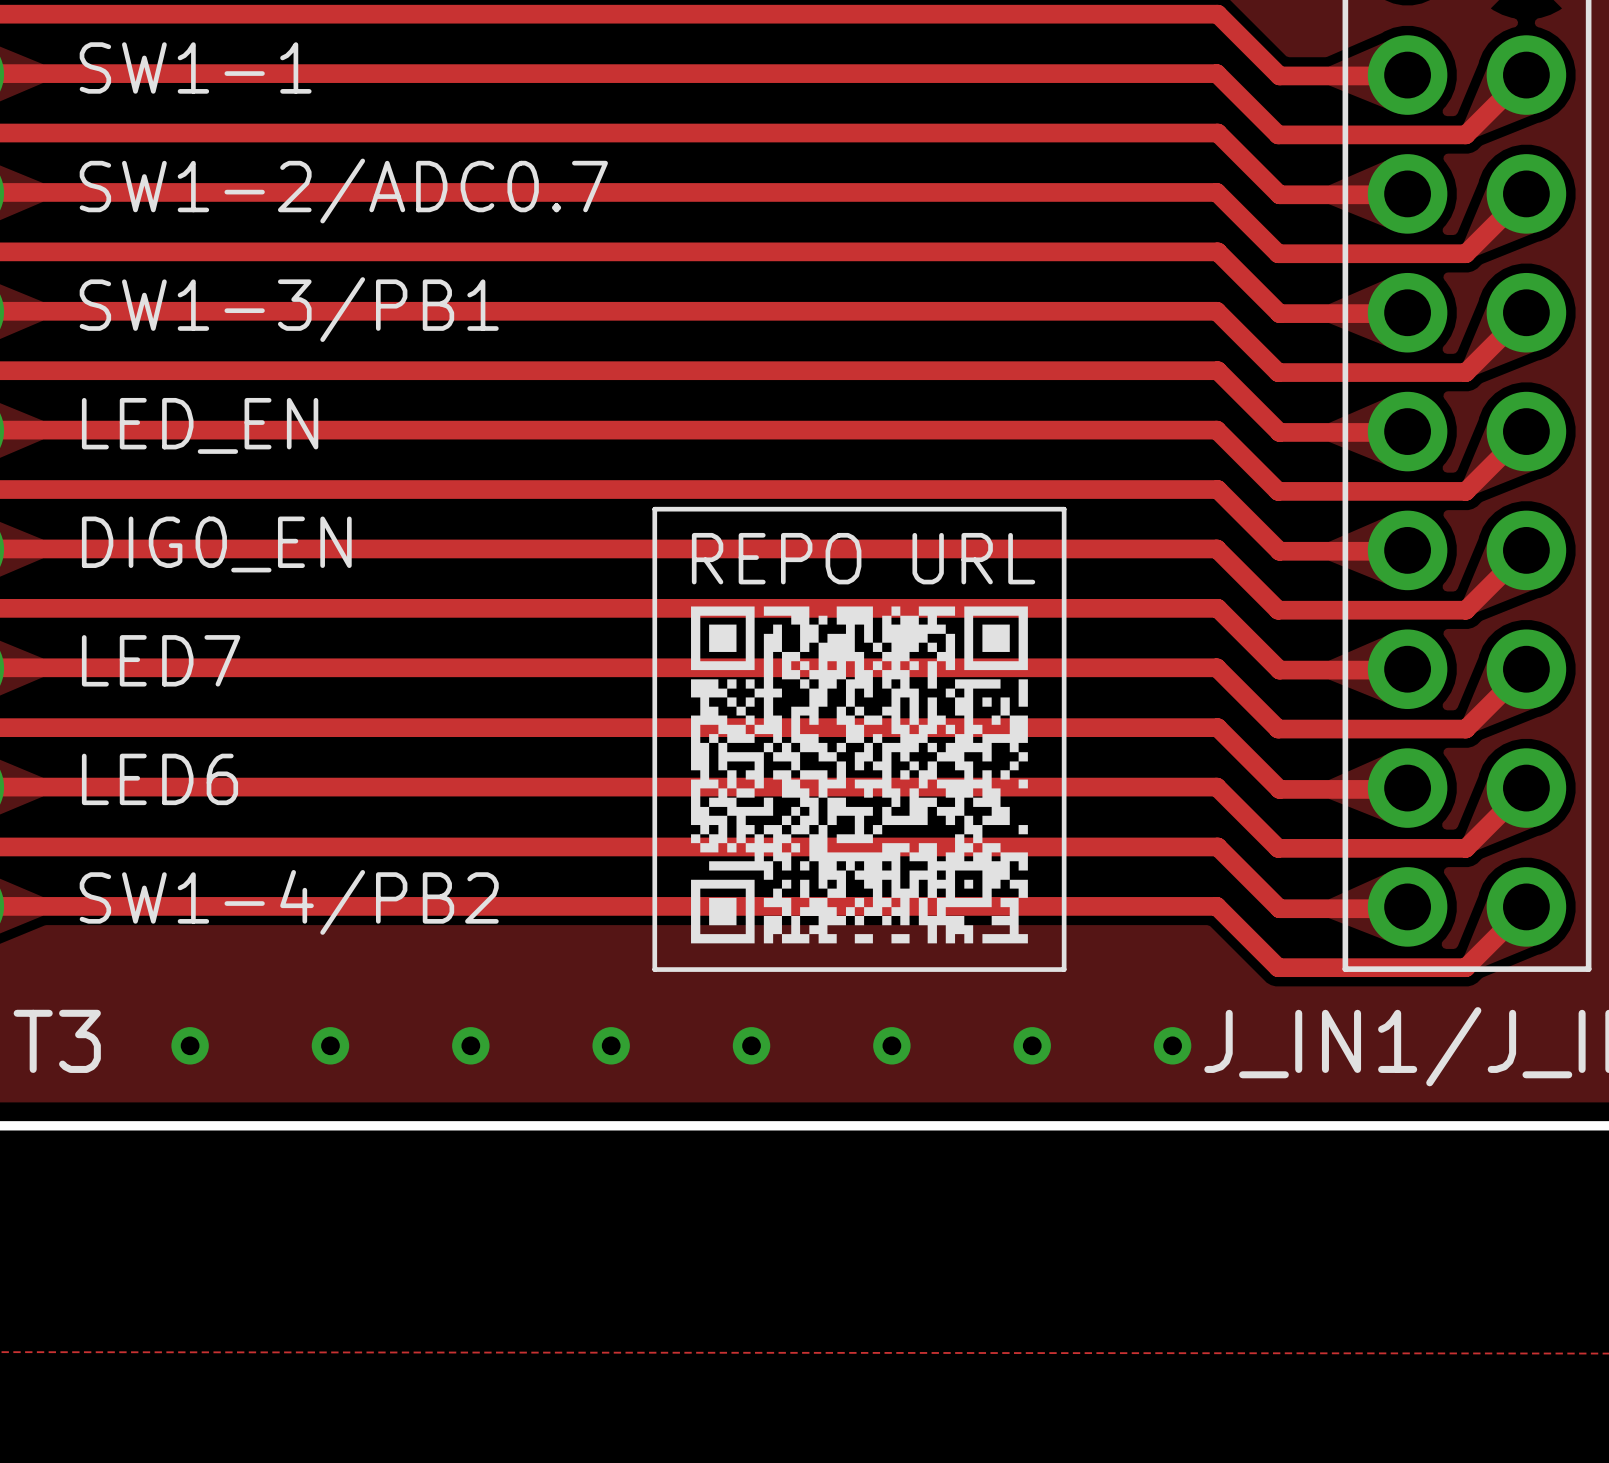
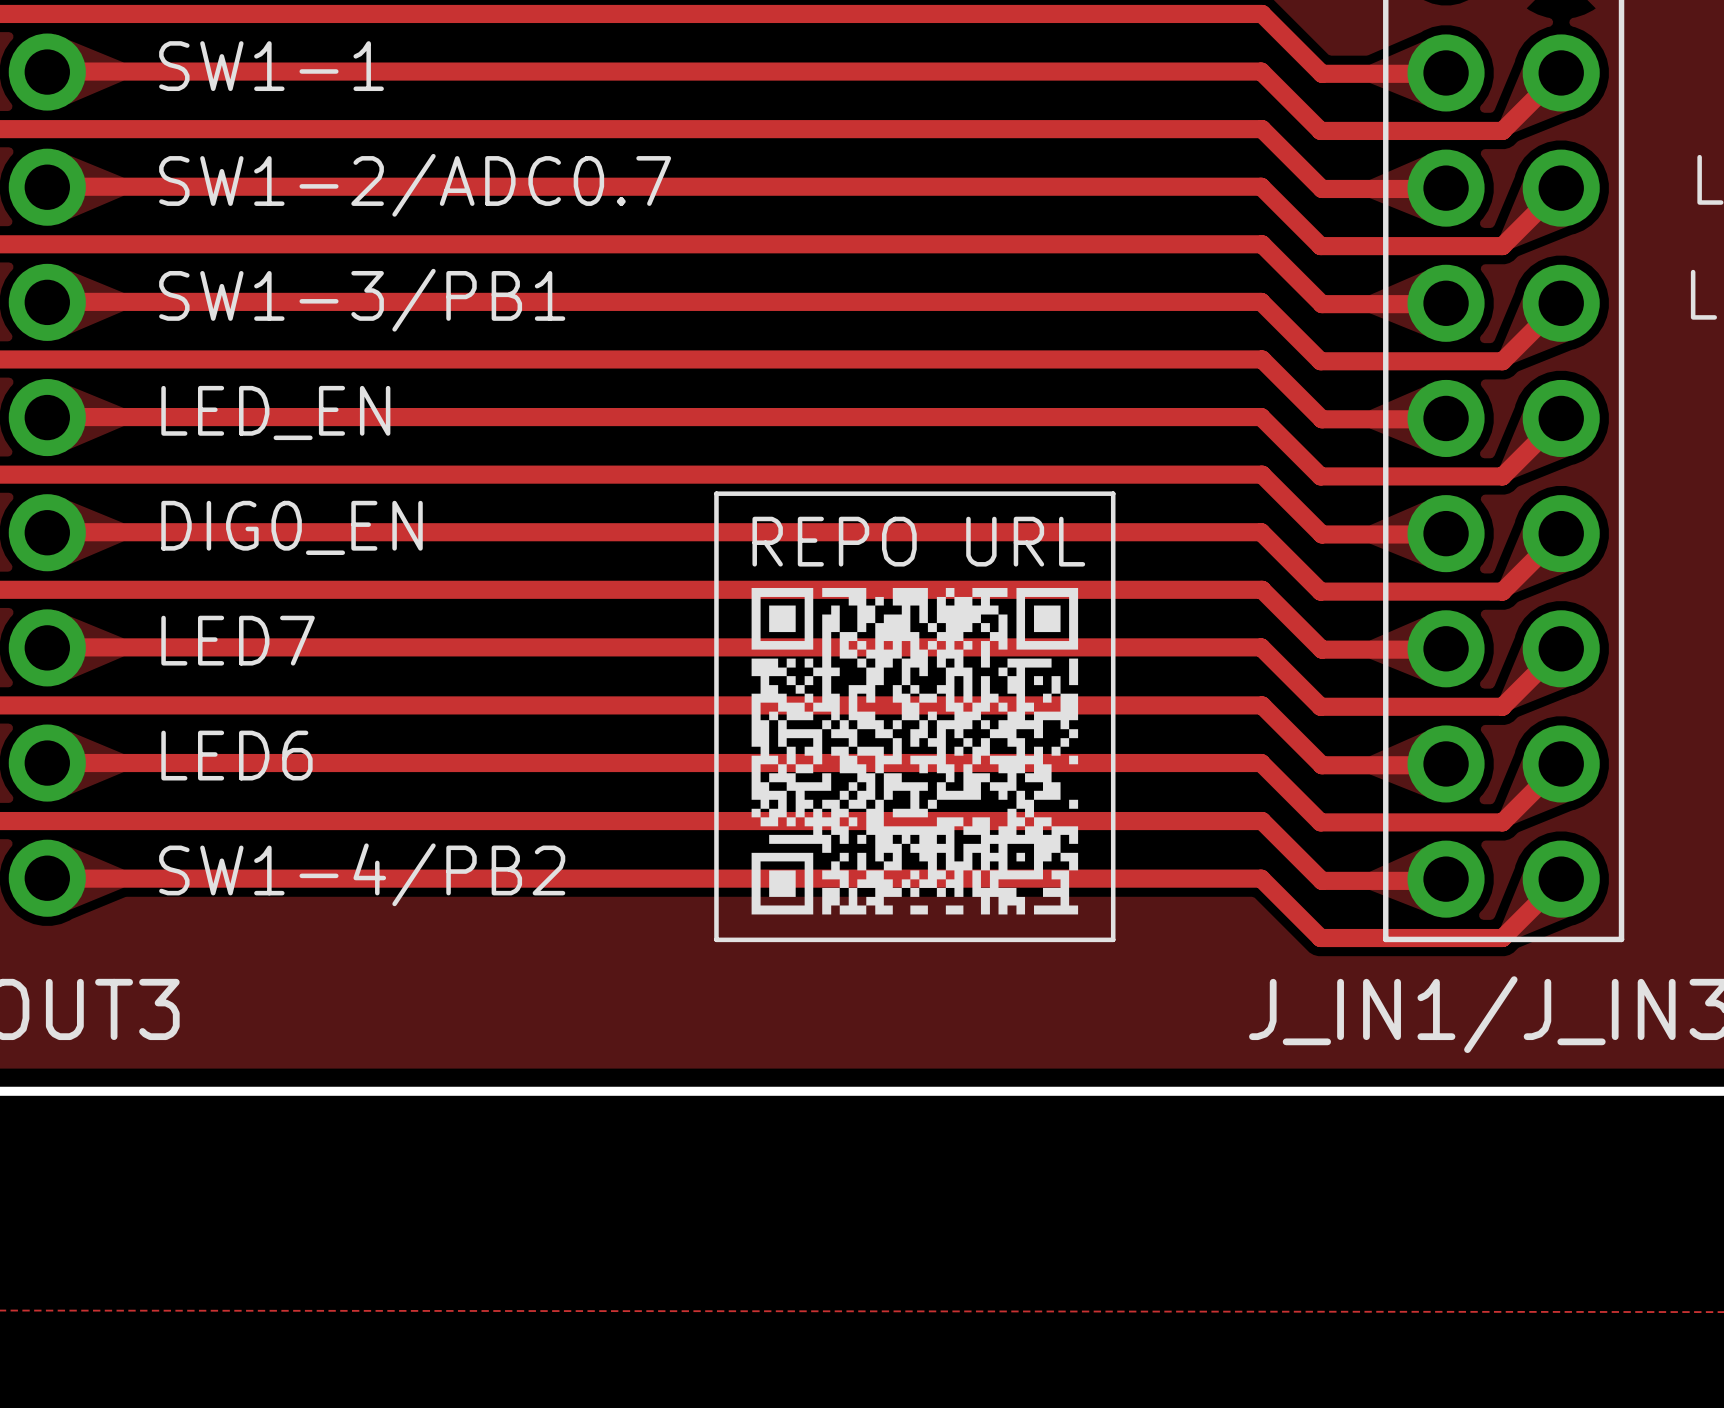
via: (190, 1045) -> none
via: (330, 1045) -> none
via: (470, 1045) -> none
via: (611, 1045) -> none
via: (751, 1045) -> none
via: (891, 1045) -> none
via: (1032, 1045) -> none
via: (1172, 1045) -> none

